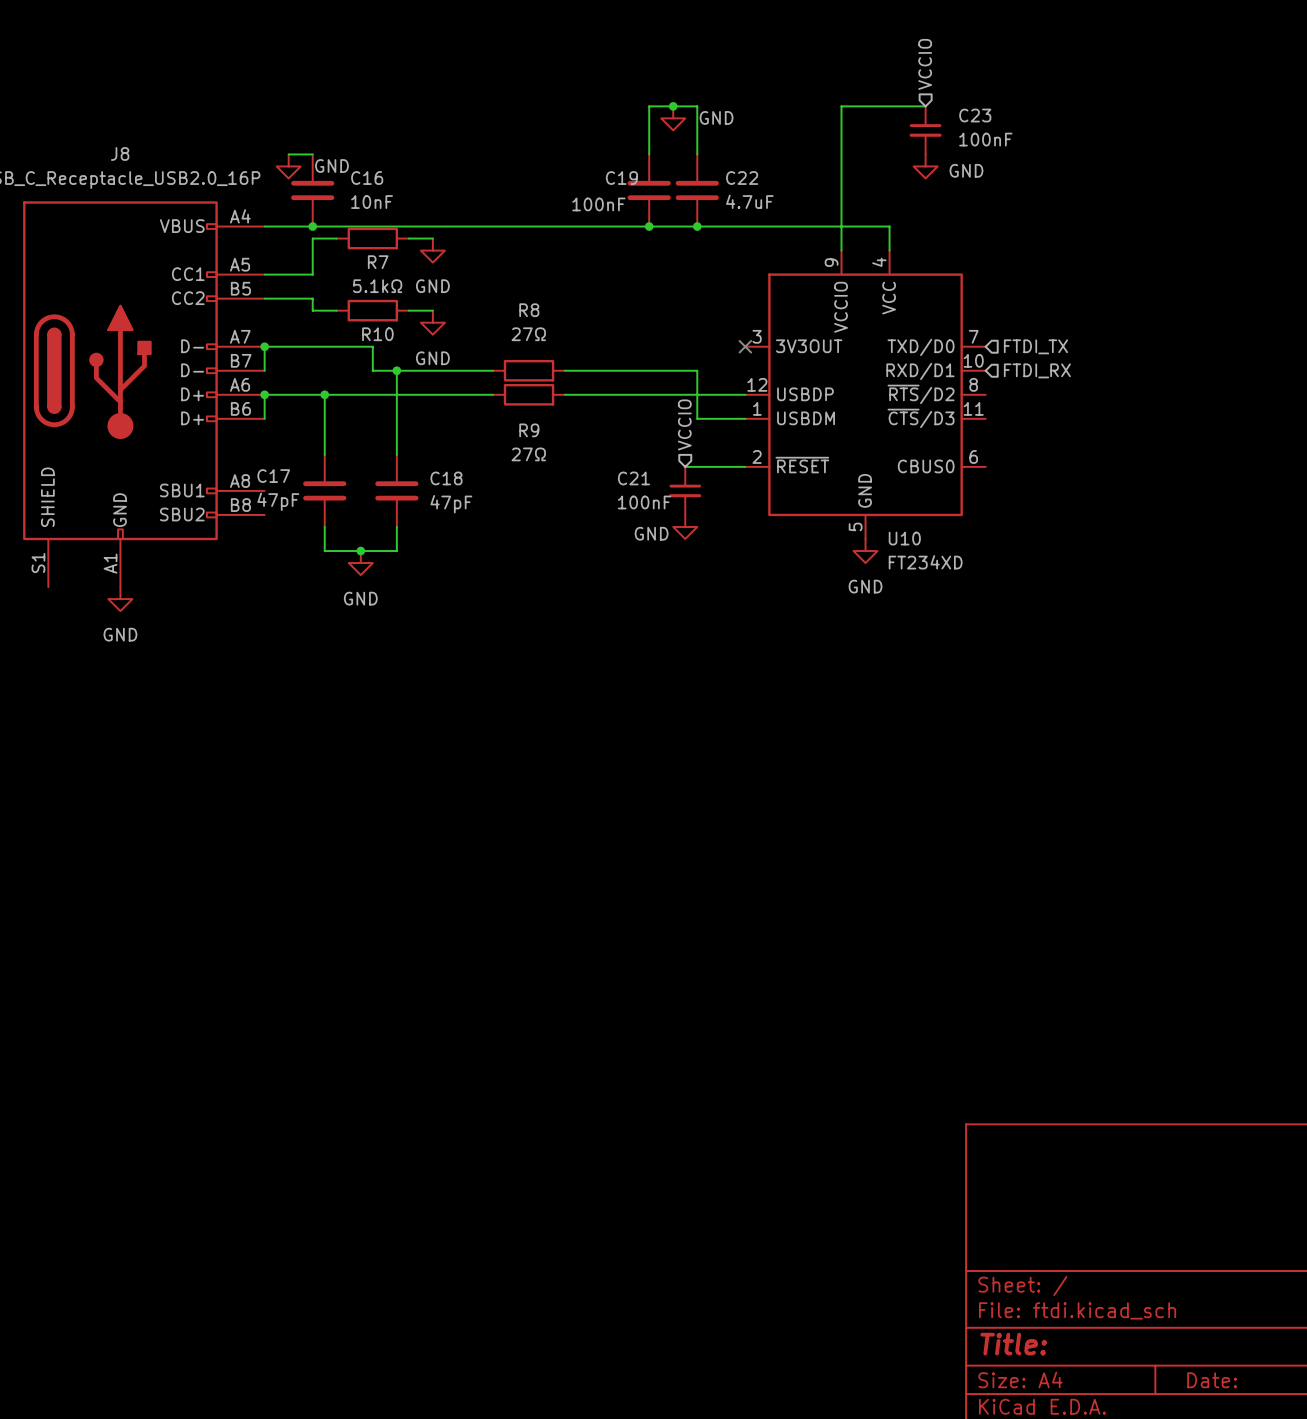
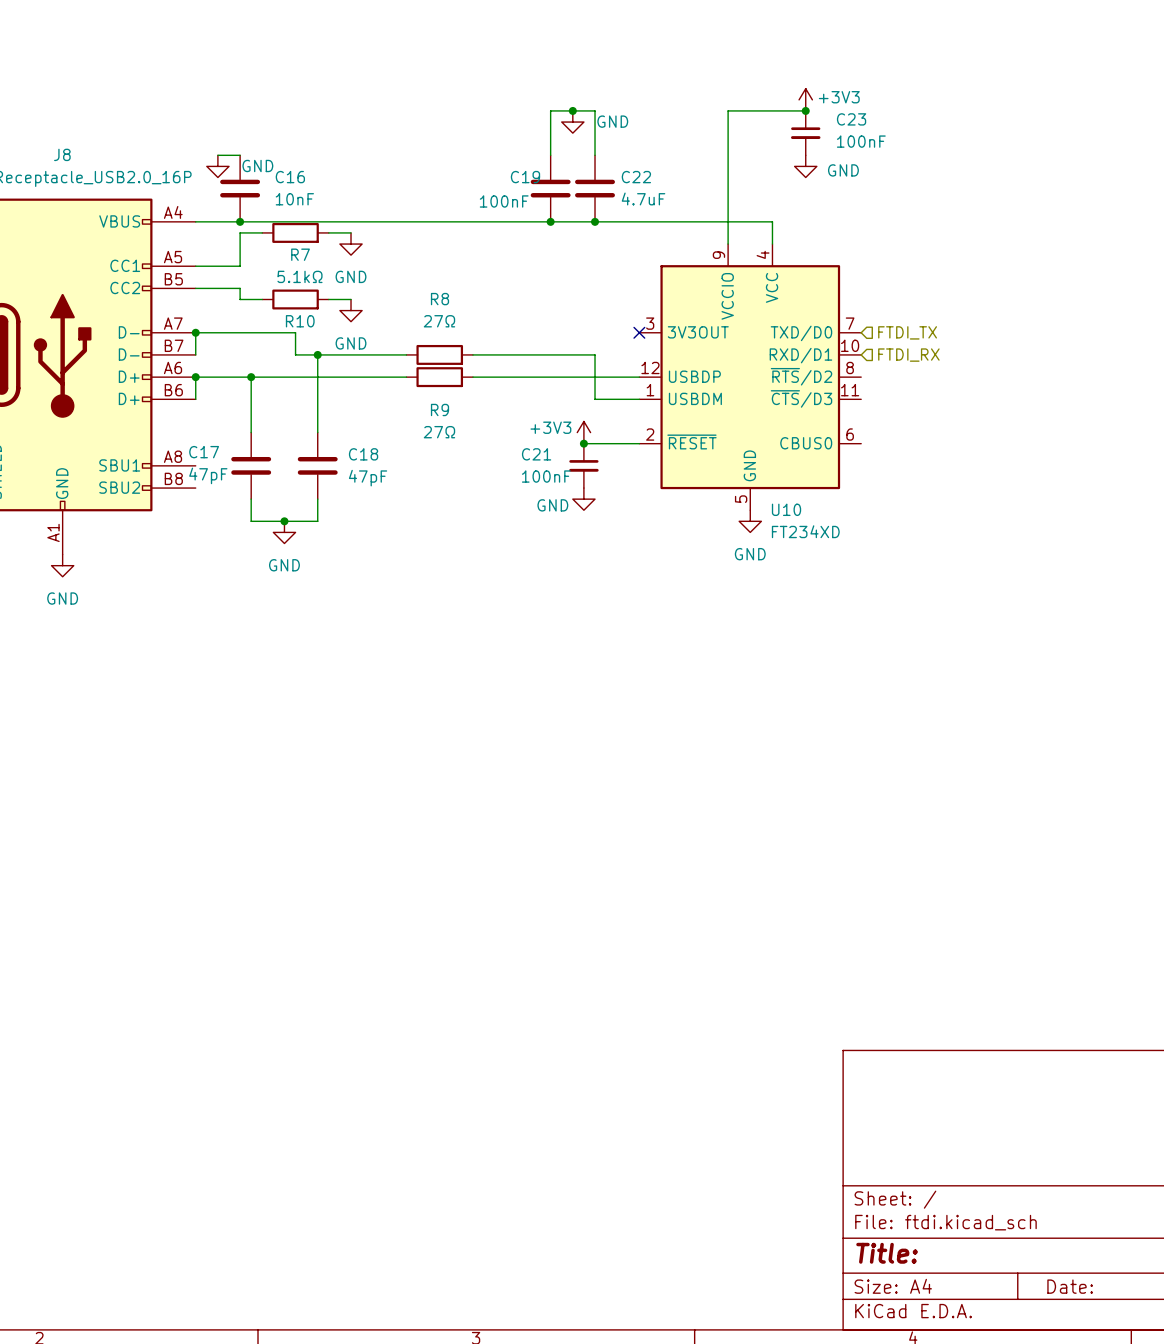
hierarchical label: VCCIO (925, 64) -> none
power symbol: none -> +3V3 (805, 99)
junction: none -> (805, 110)
hierarchical label: VCCIO (684, 424) -> none
power symbol: none -> +3V3 (583, 432)
junction: none -> (583, 443)

